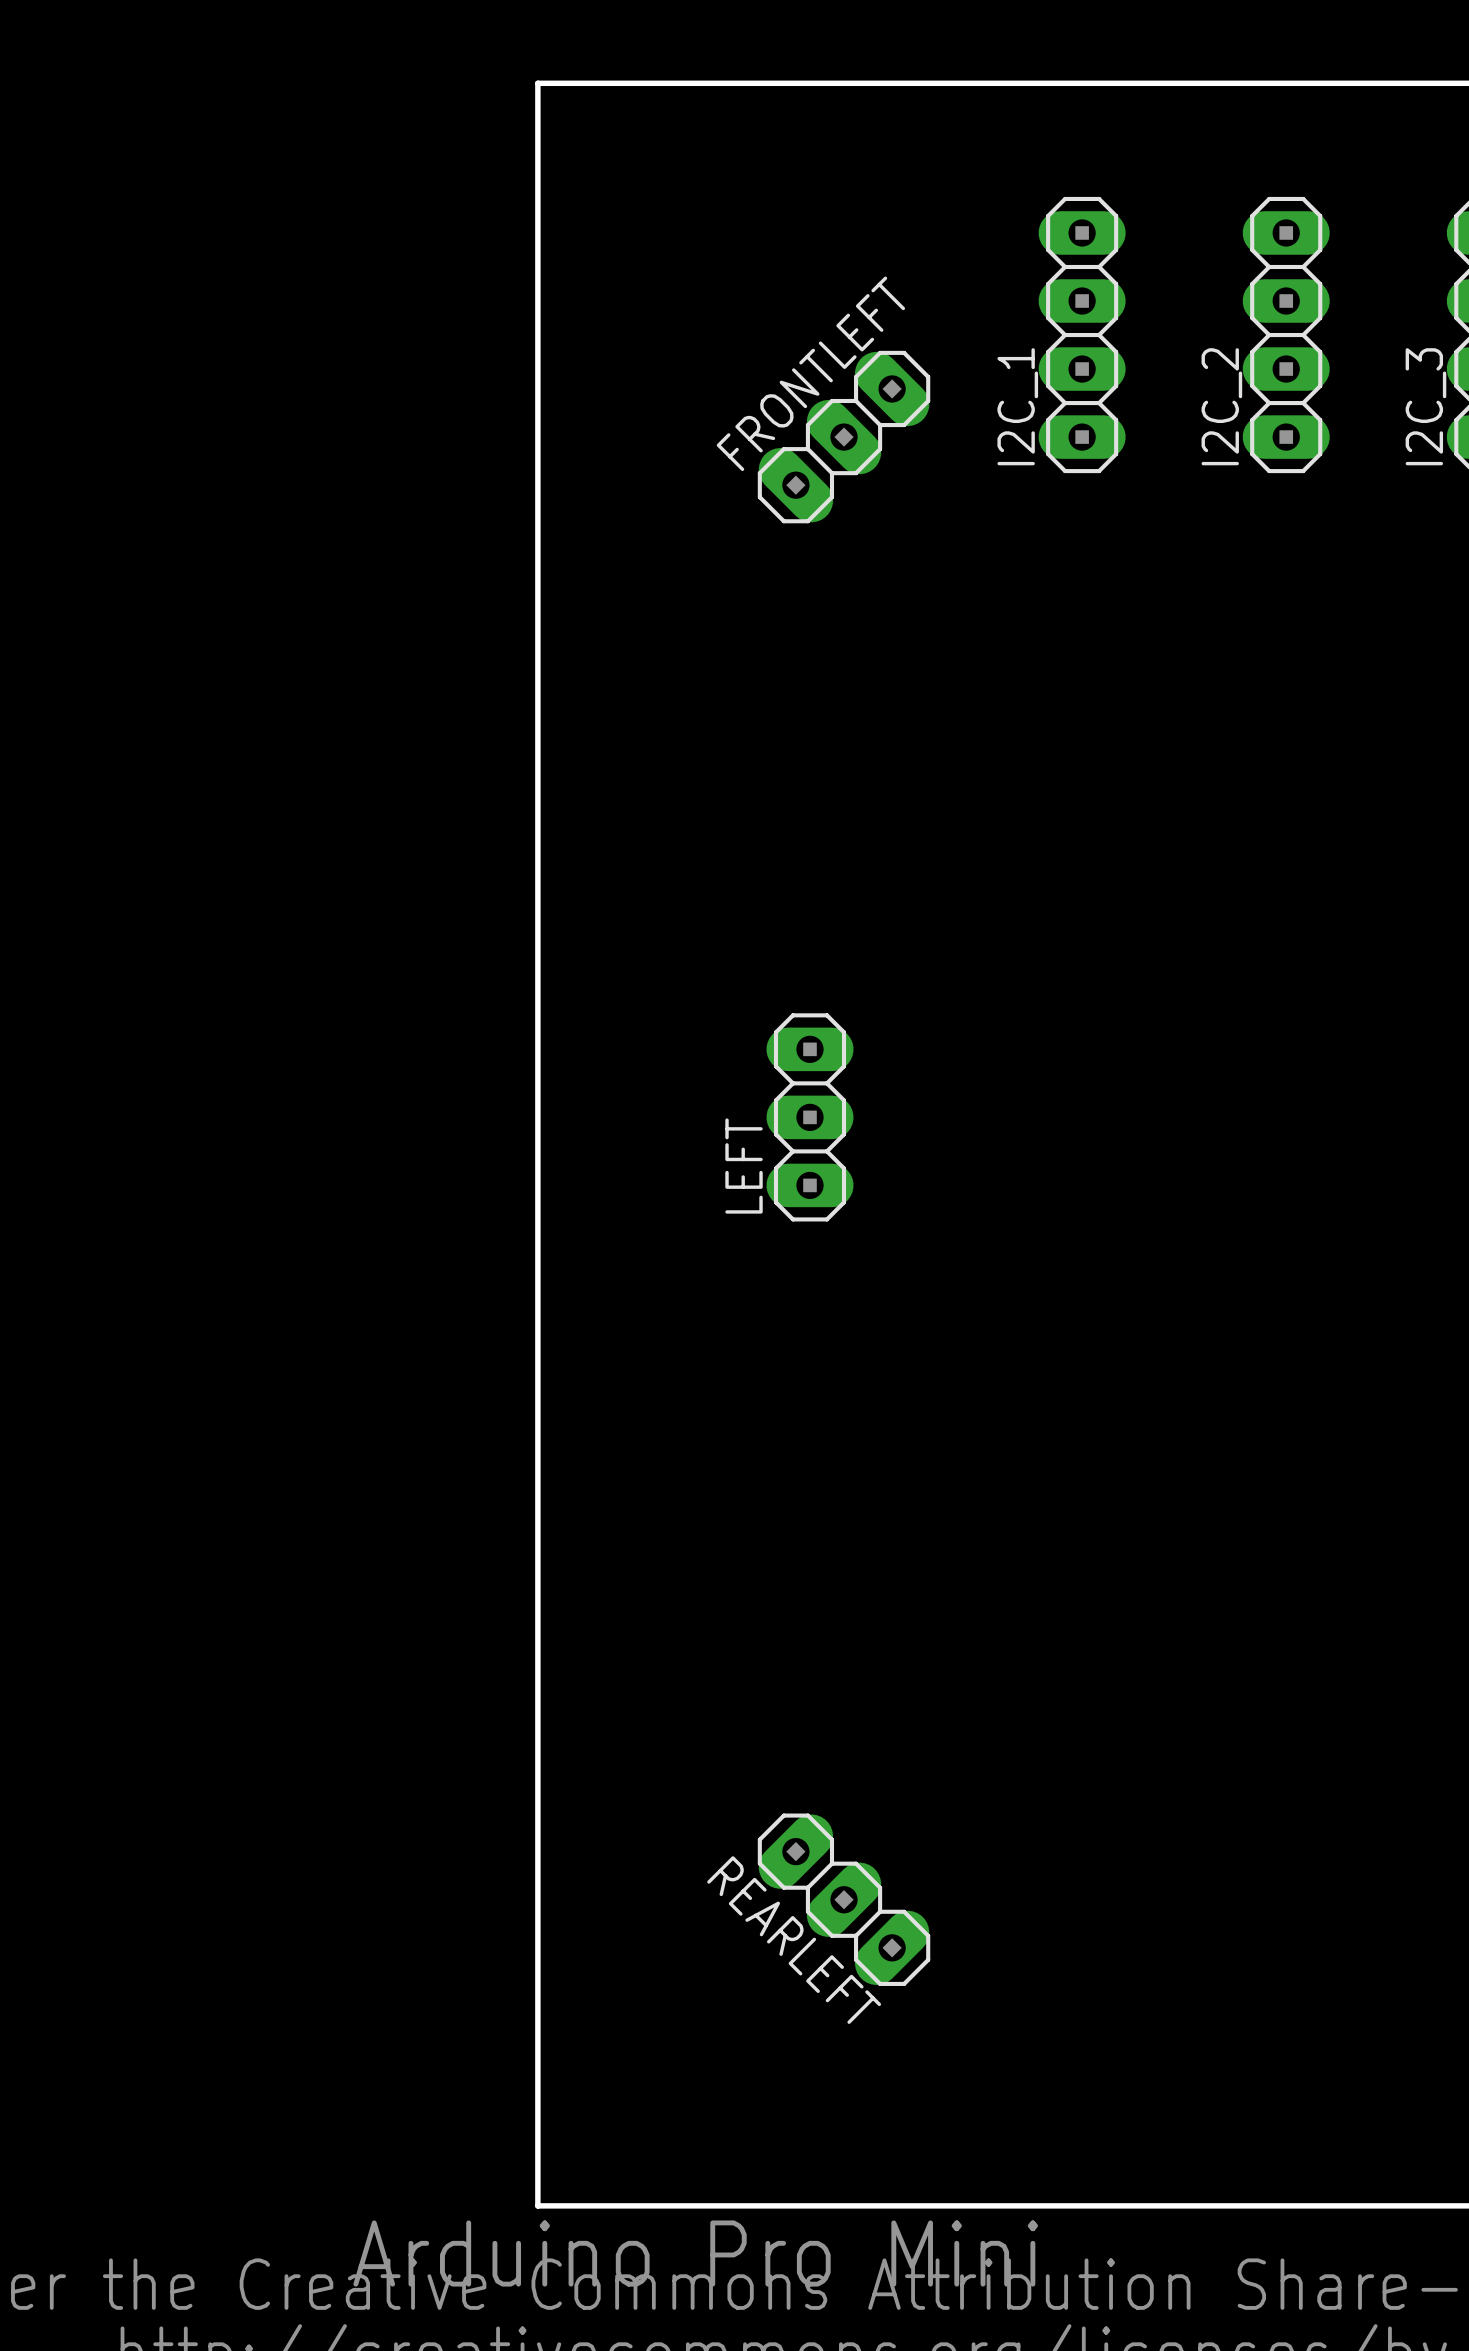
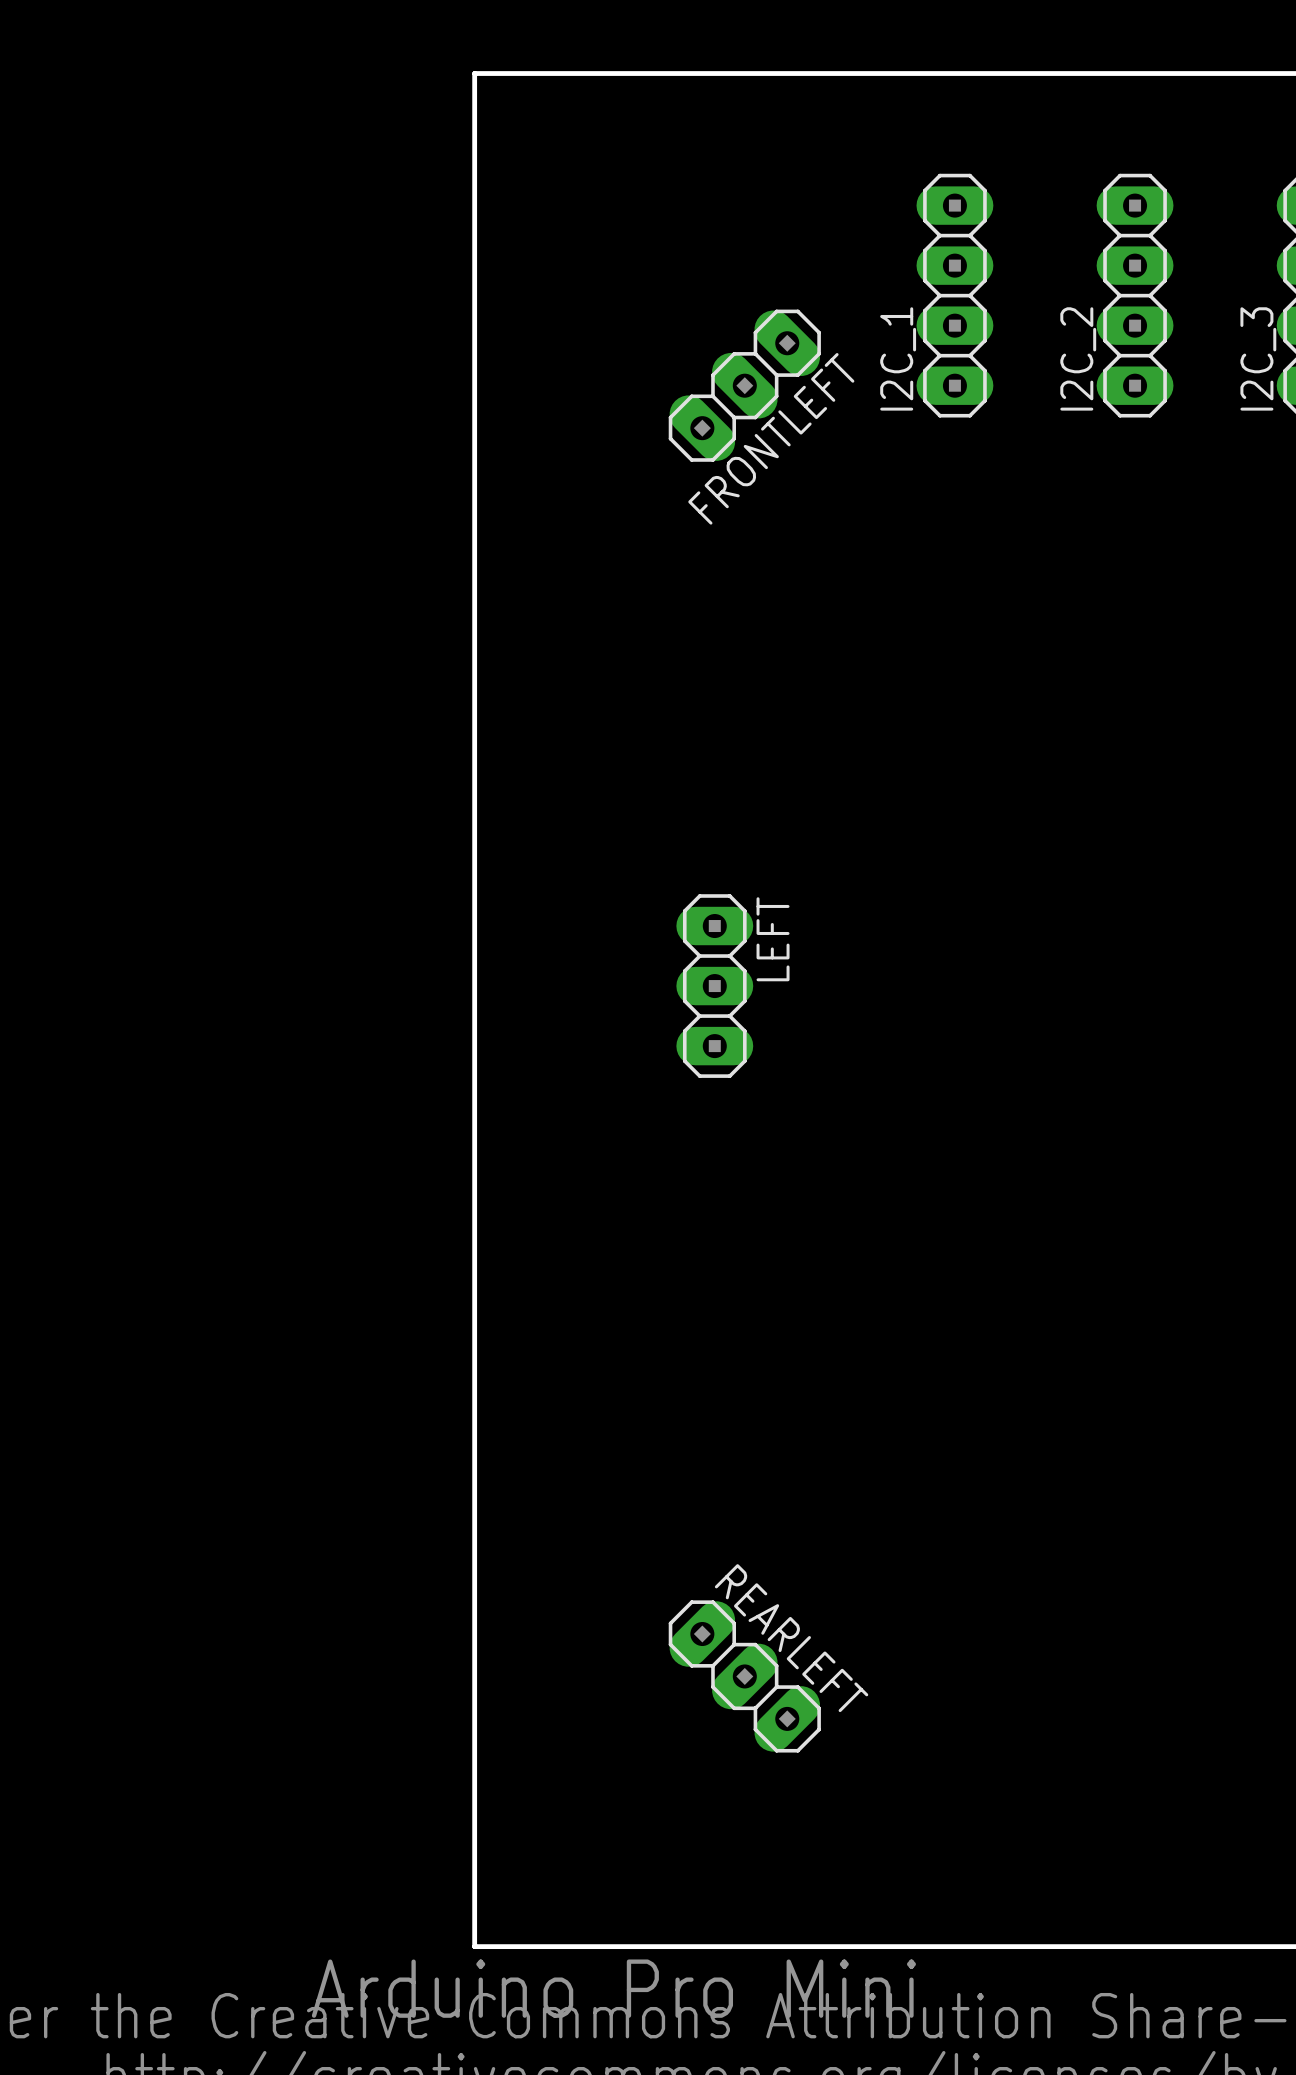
FRONTLEFT name position: FRONTLEFT (810, 373) -> FRONTLEFT (771, 438)
LEFT name position: LEFT (744, 1166) -> LEFT (773, 939)
REARLEFT name position: REARLEFT (794, 1940) -> REARLEFT (791, 1638)

